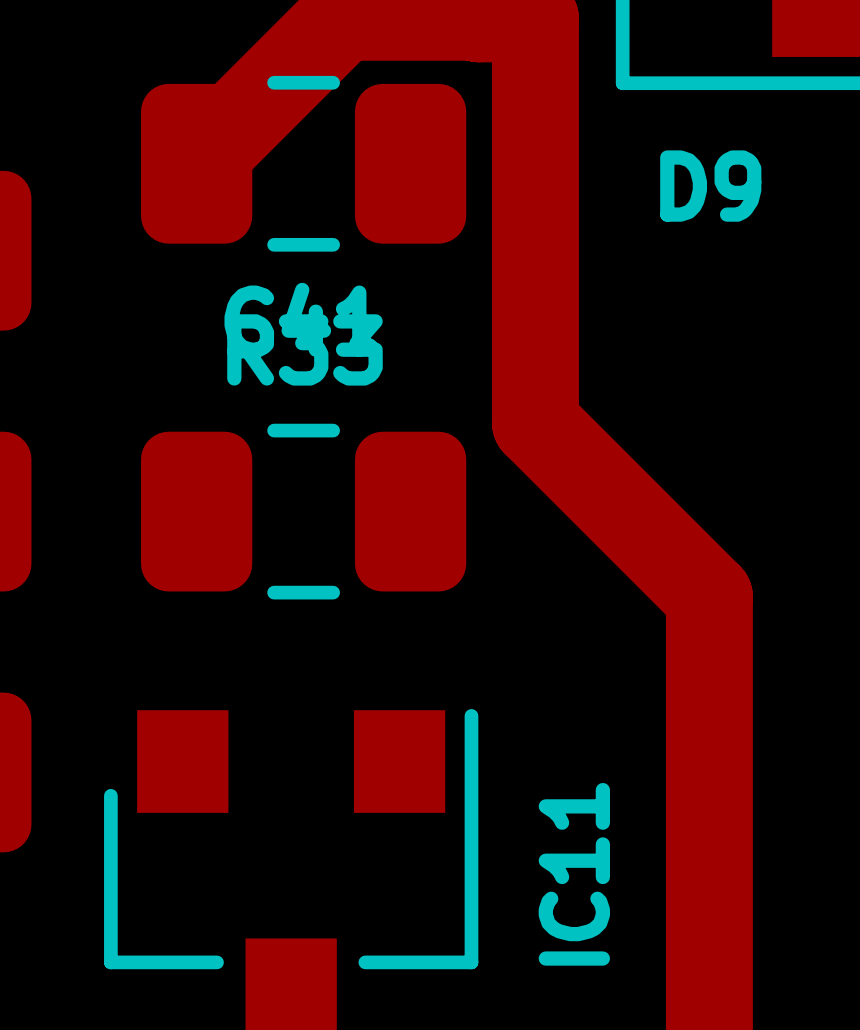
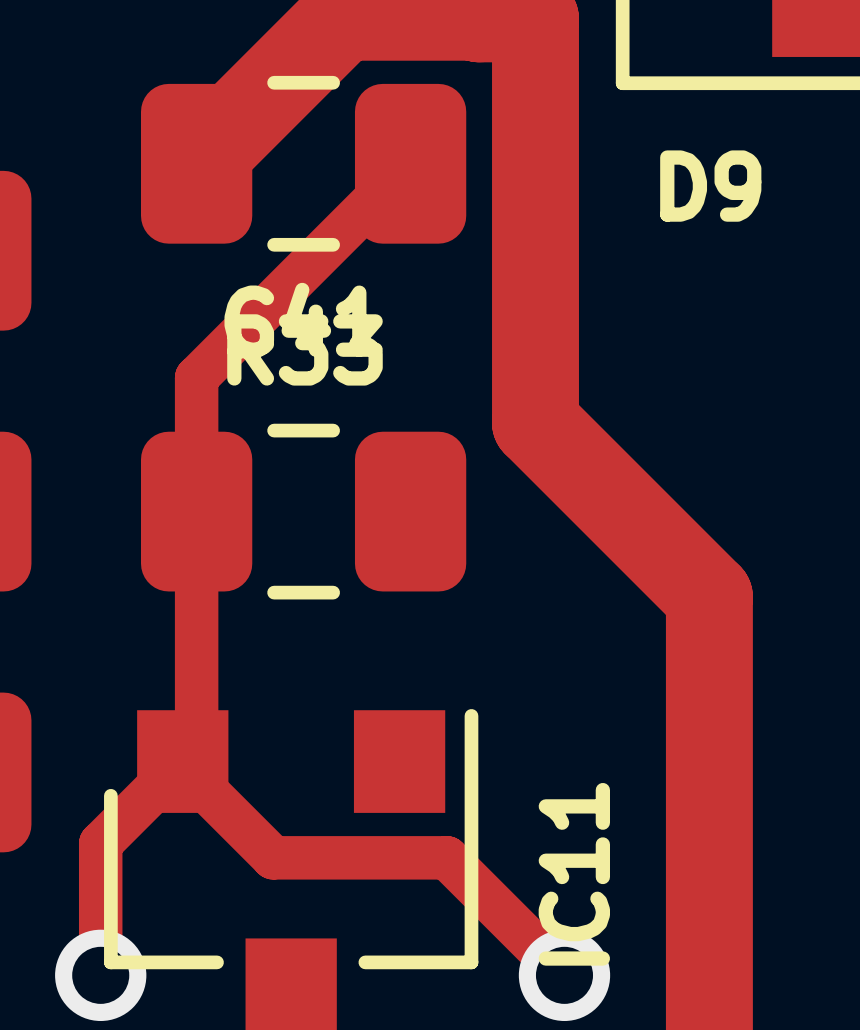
track: none -> (410, 163) (196, 377) (196, 747) (100, 843) (100, 975)
track: none -> (182, 761) (182, 767) (273, 857) (446, 857) (564, 975)
via: none -> (100, 975)
via: none -> (564, 975)

